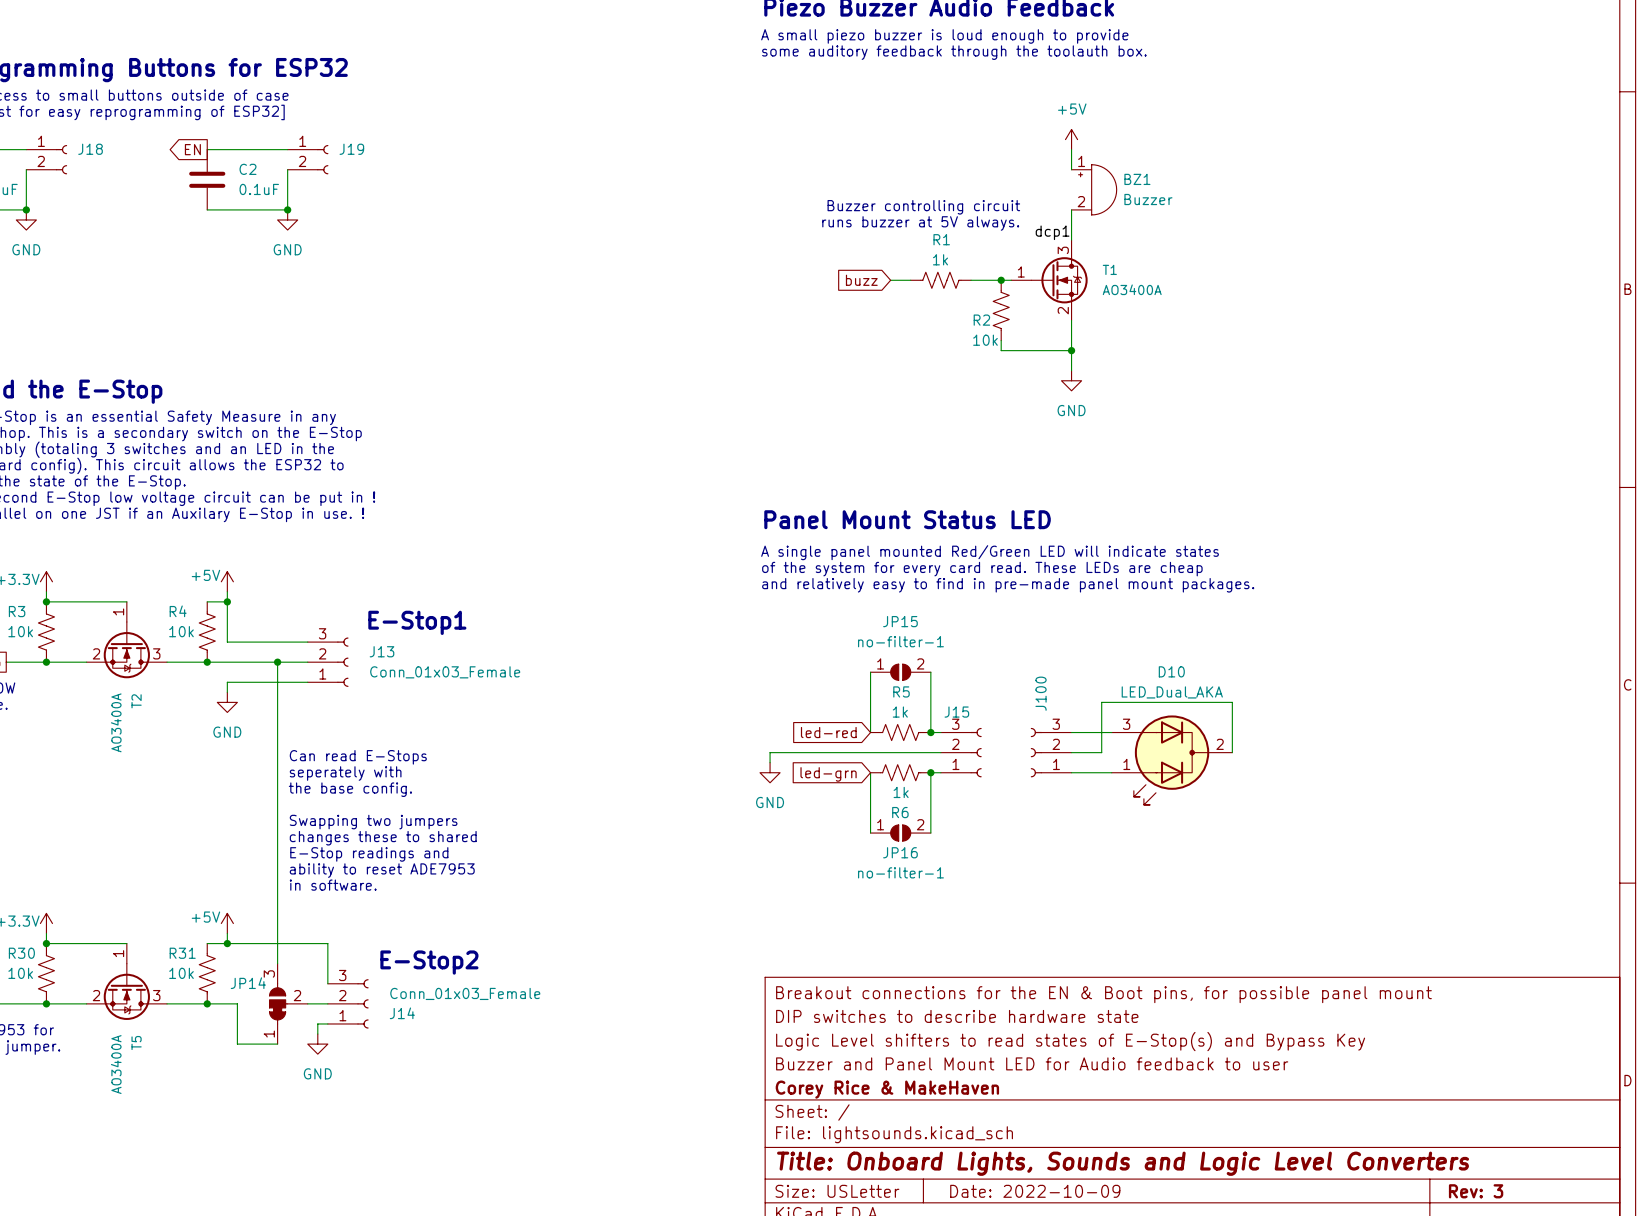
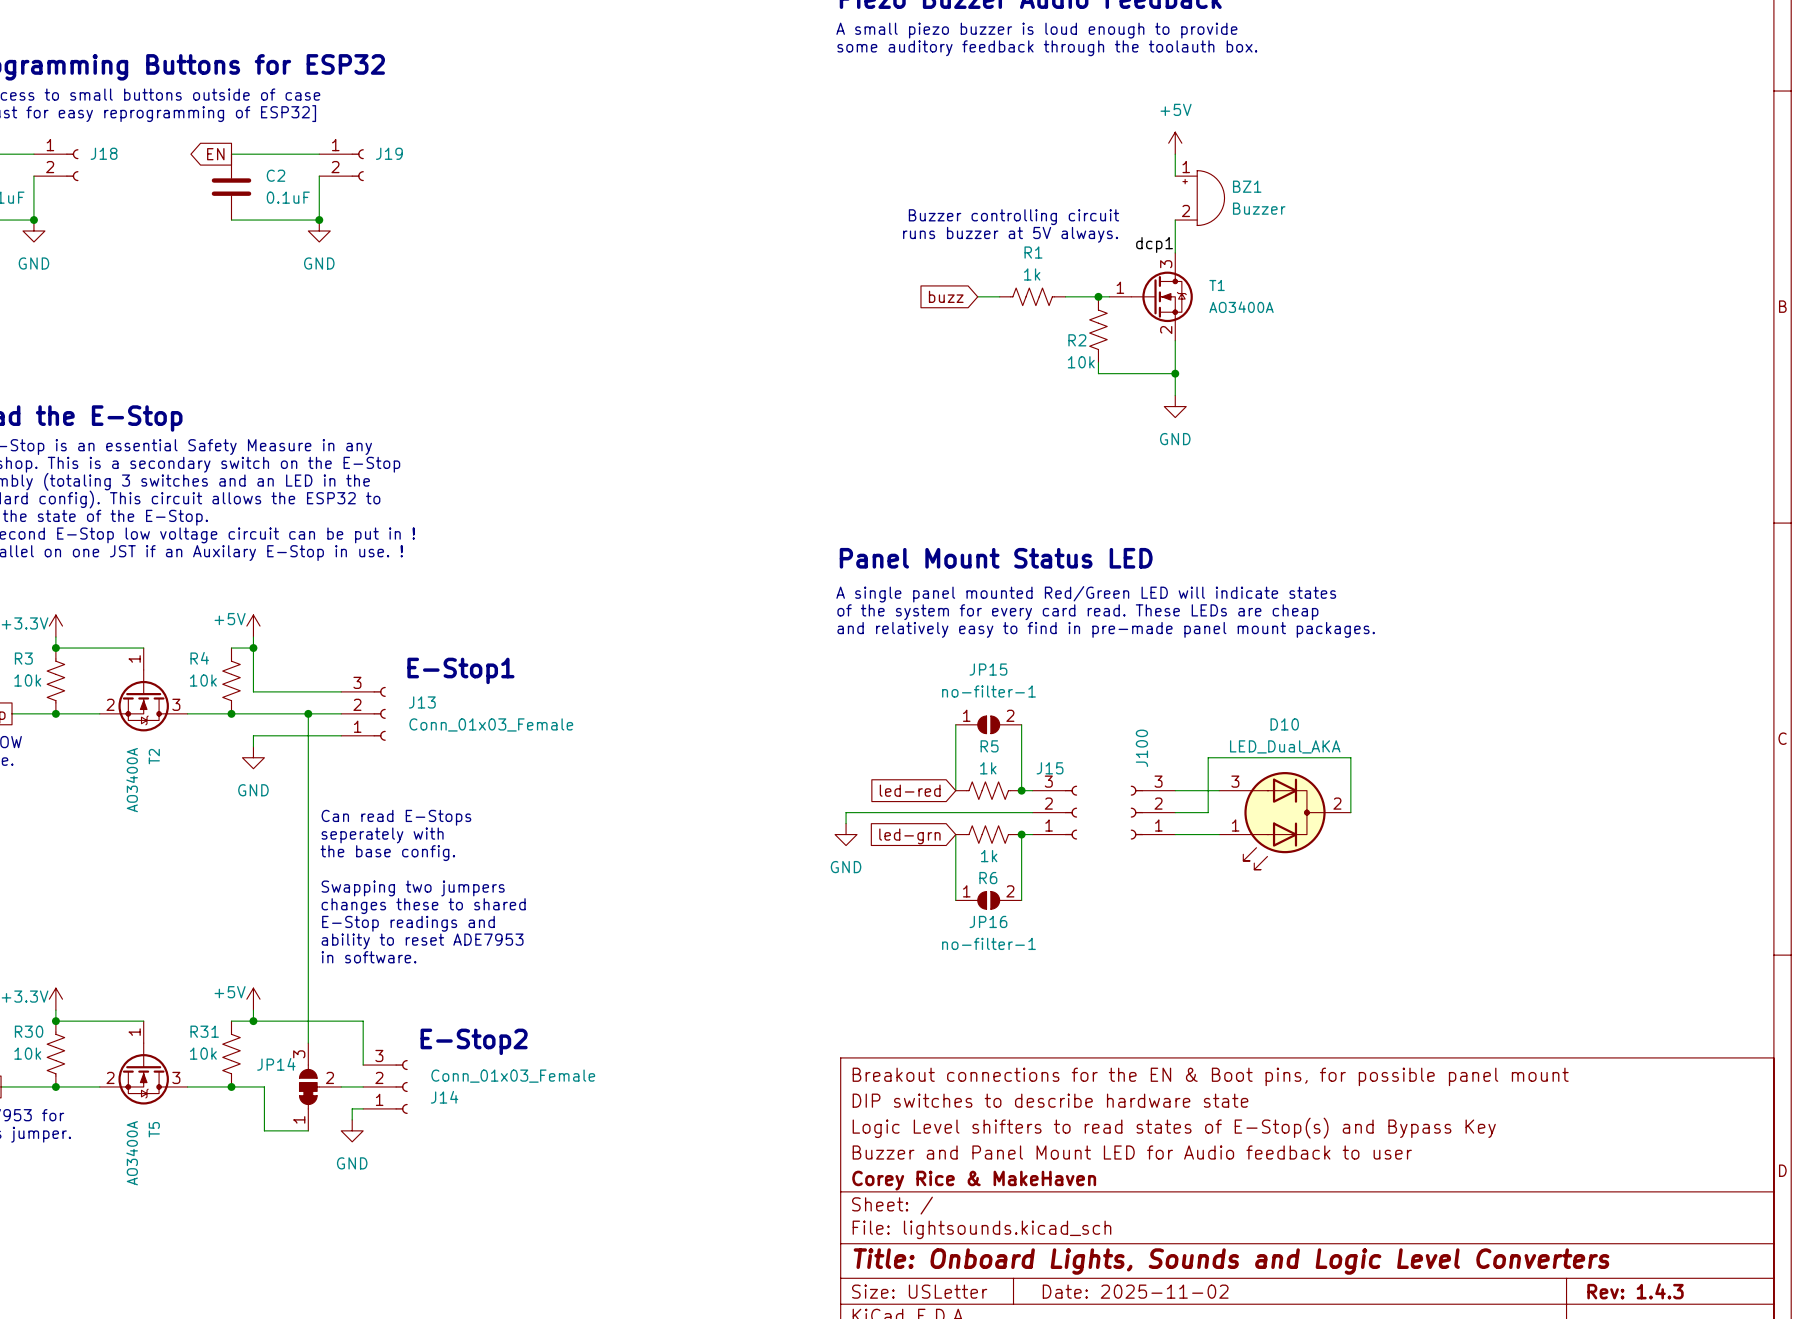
title block: Date: 2022-10-09 (1035, 1191) -> Date: 2025-11-02 (1135, 1291)
title block: Rev: 3 (1476, 1191) -> Rev: 1.4.3 (1635, 1291)

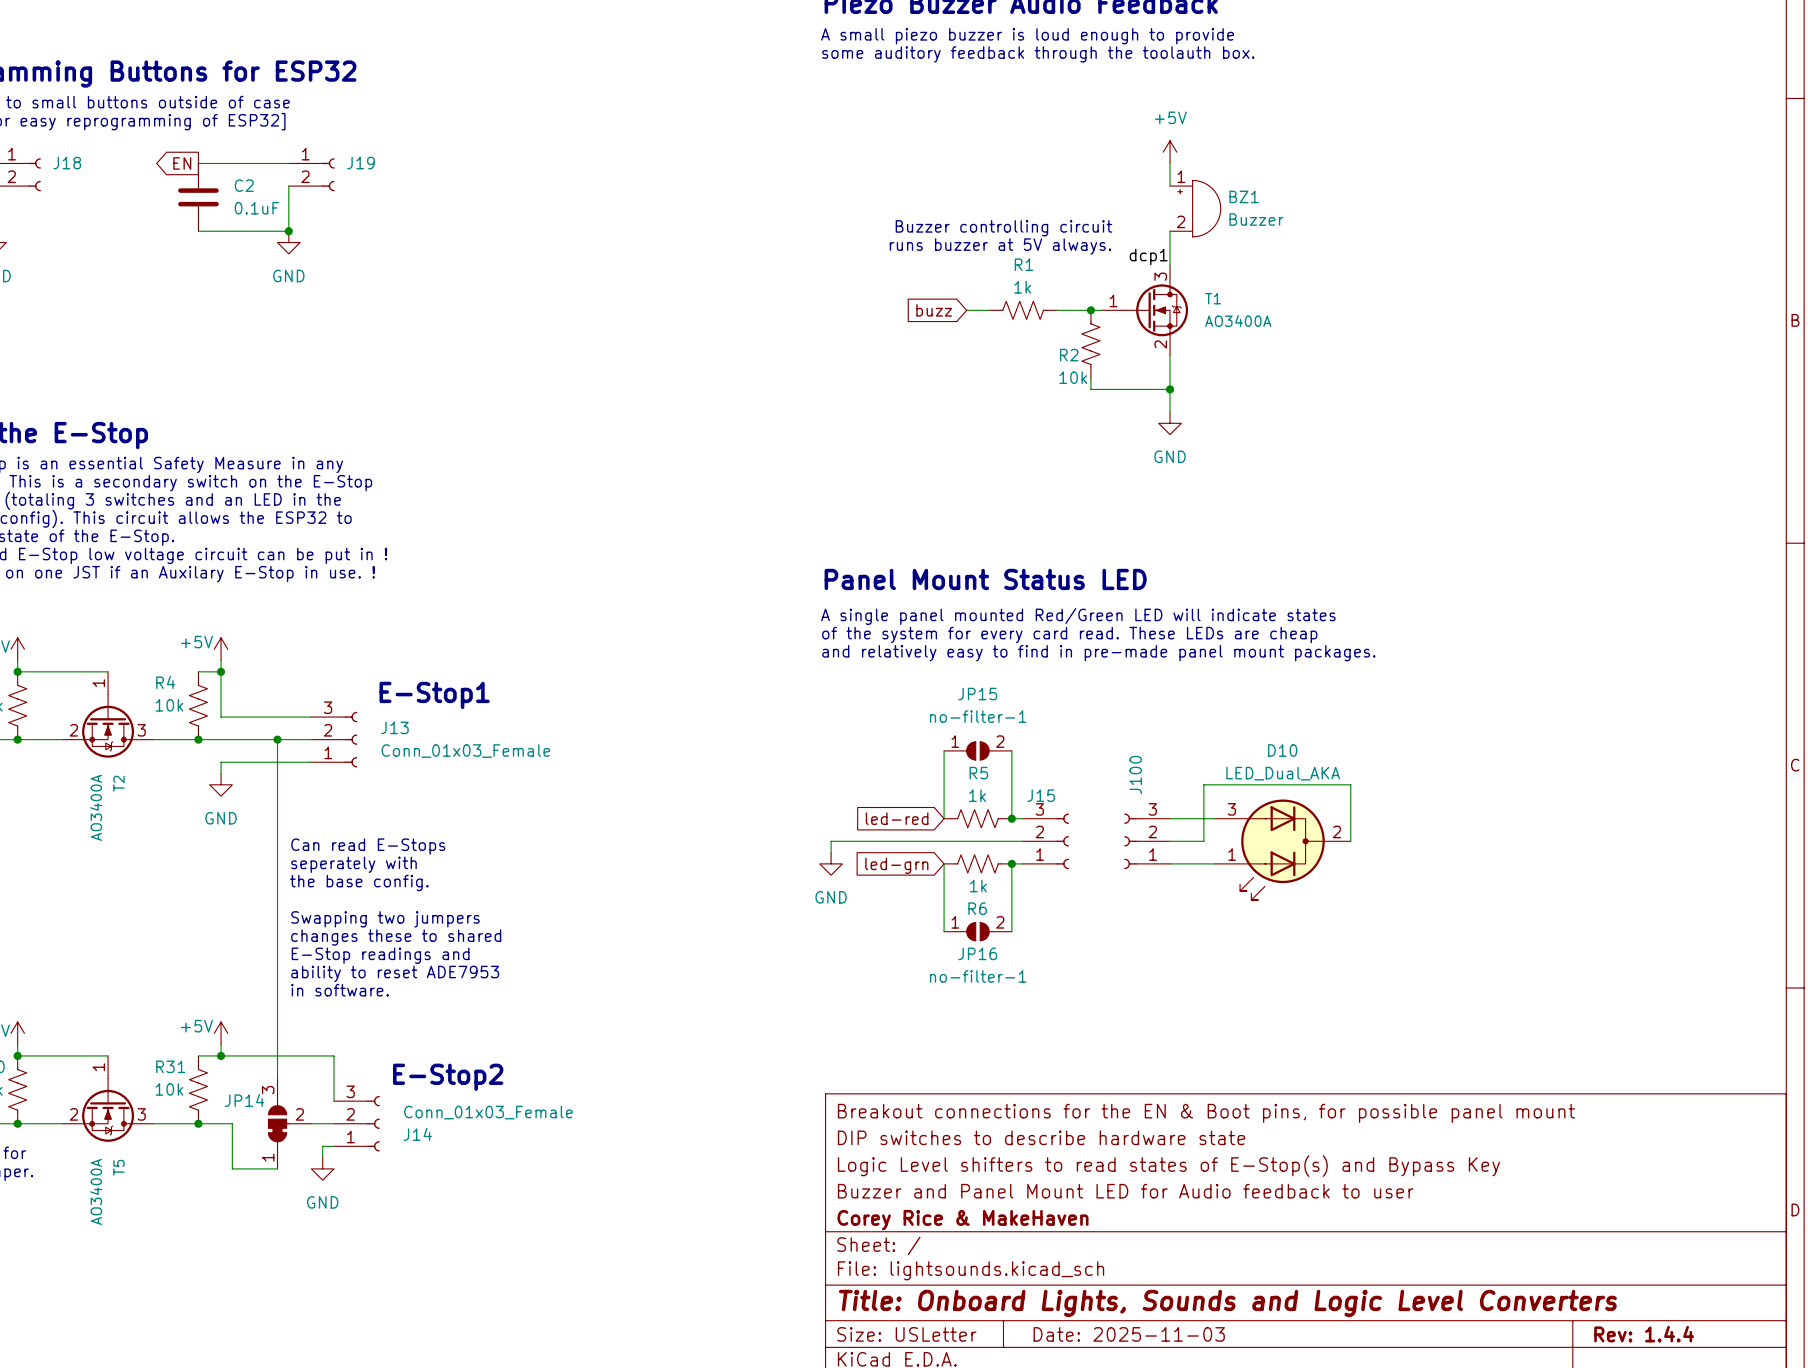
title block: Date: 2025-11-02 (1135, 1291) -> Date: 2025-11-03 (1129, 1334)
title block: Rev: 1.4.3 (1635, 1291) -> Rev: 1.4.4 (1644, 1334)

